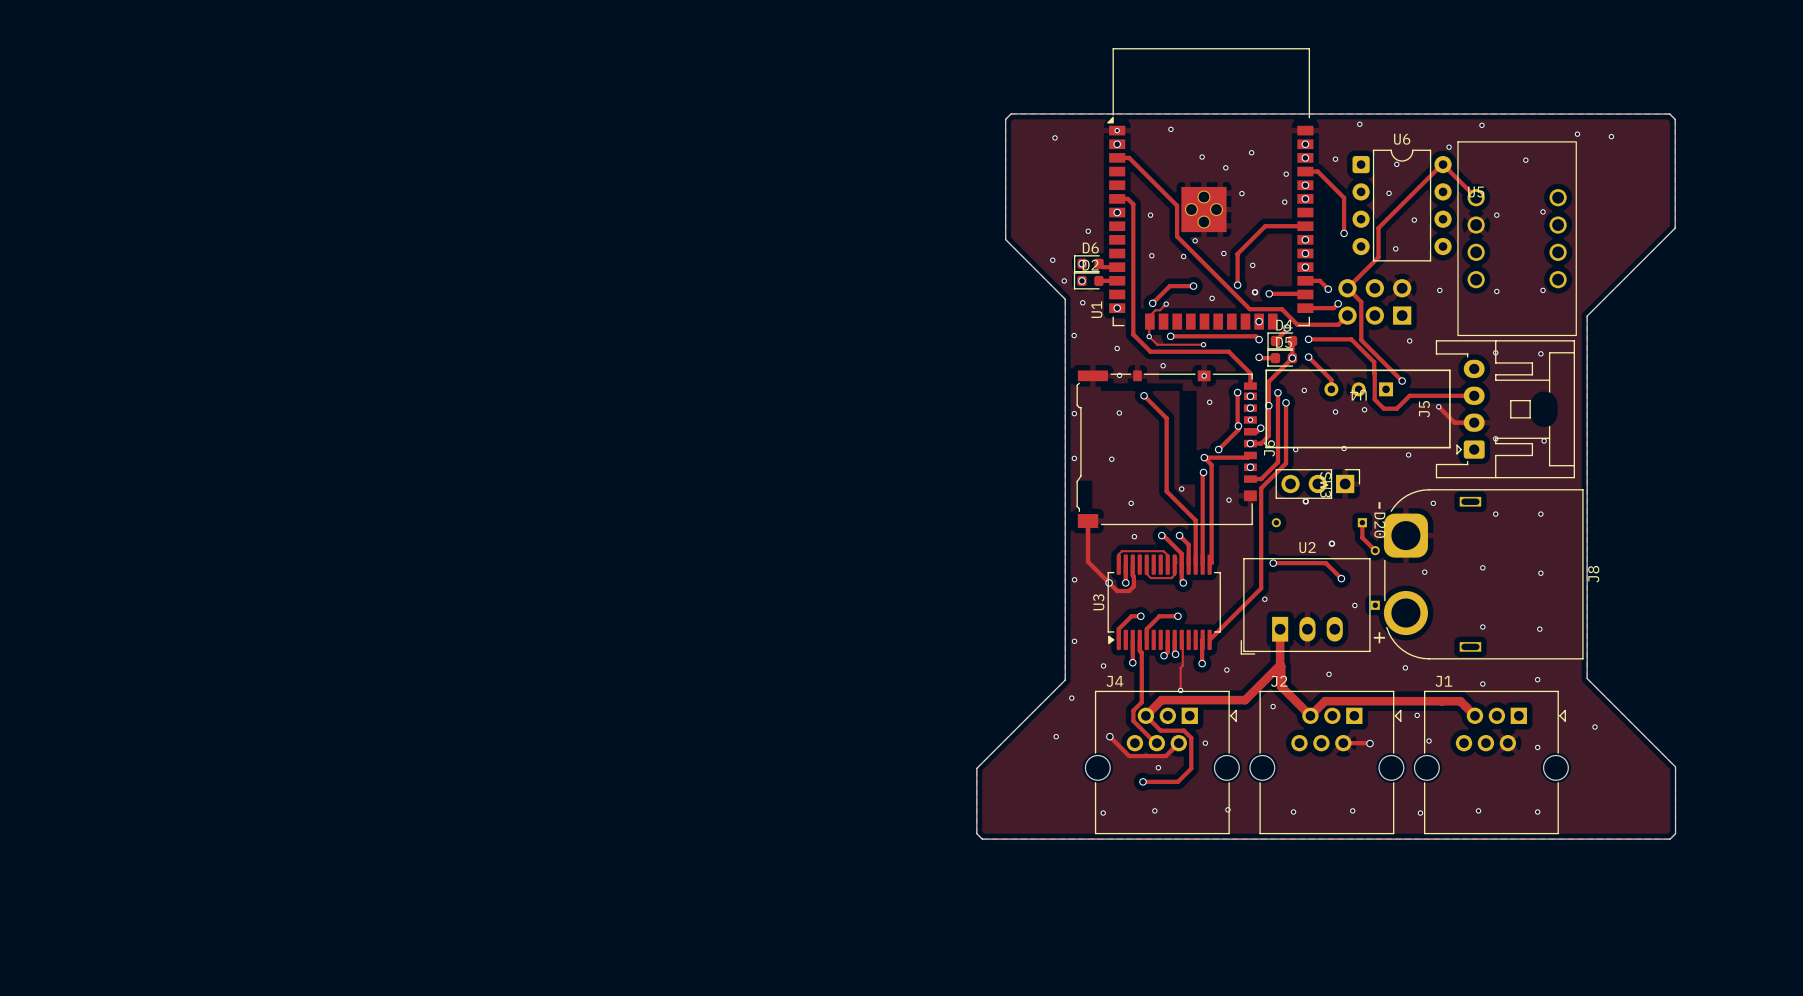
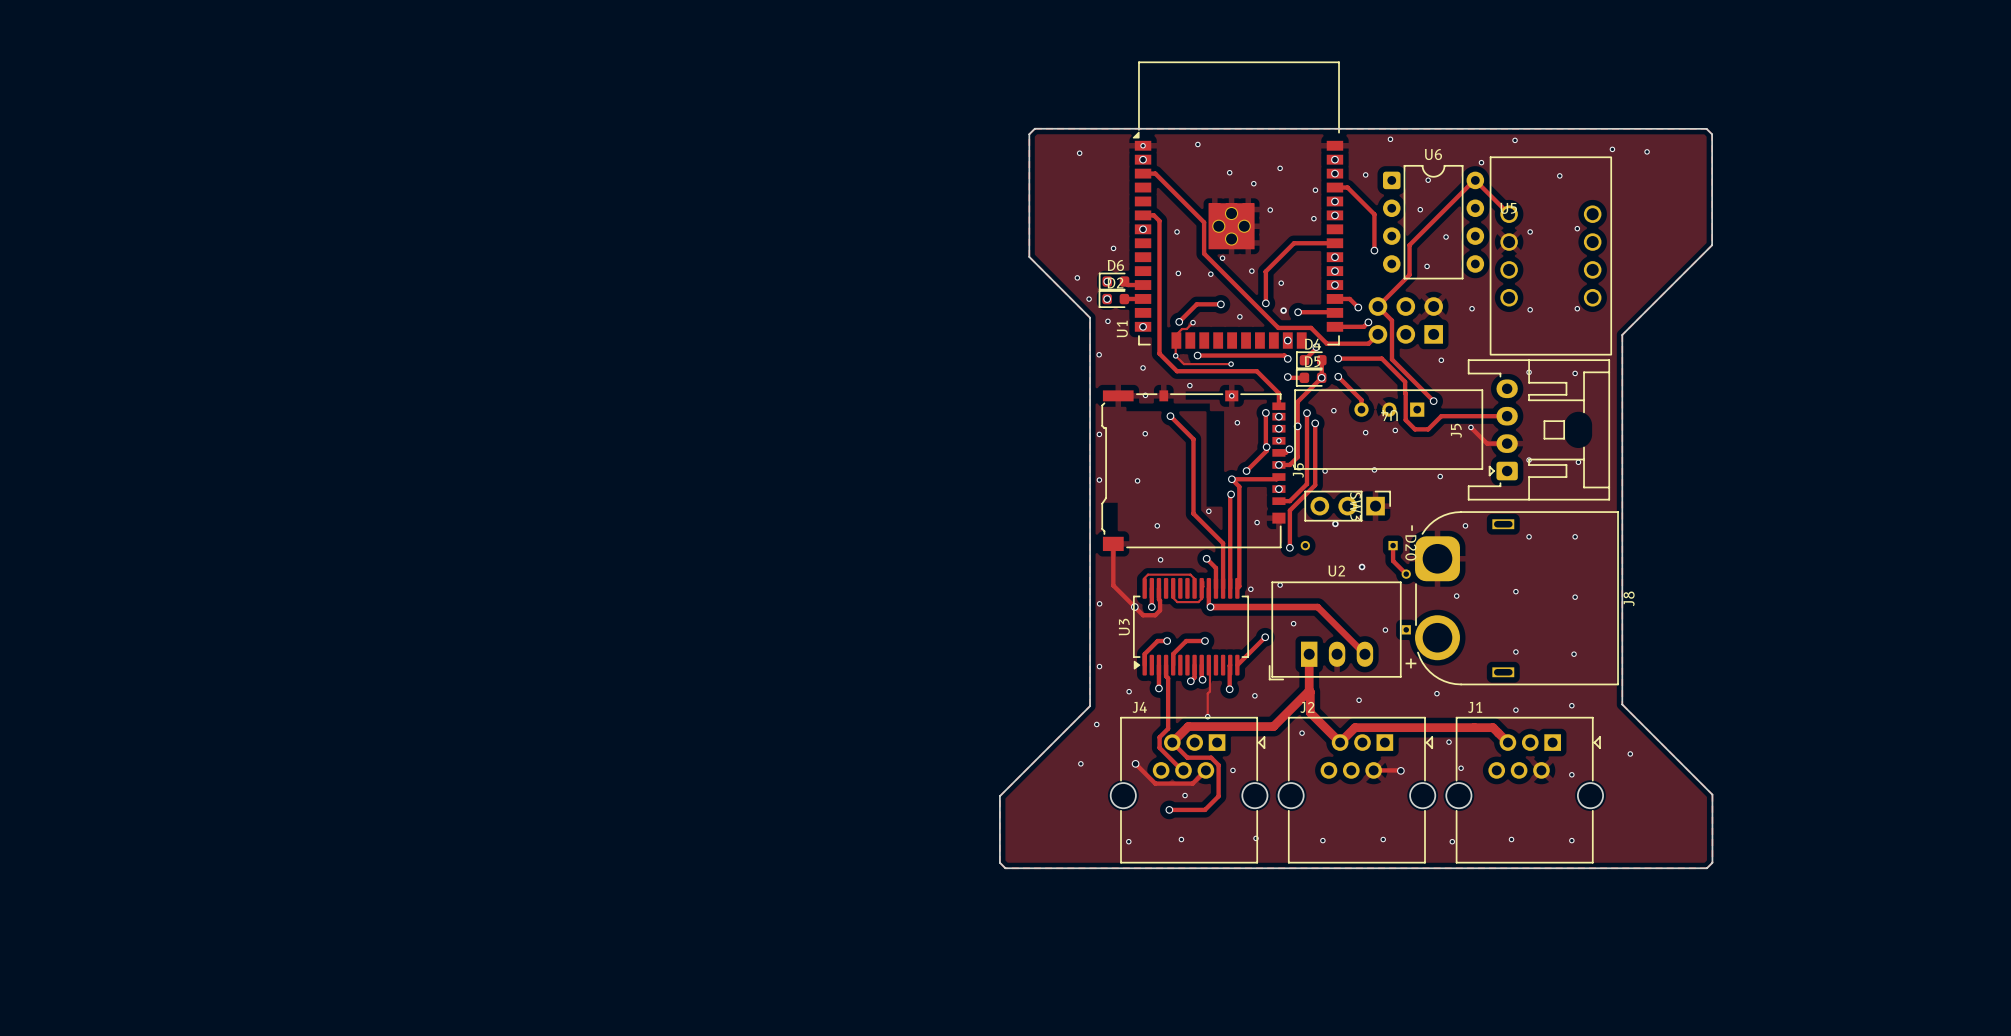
track: (1261, 524) (1261, 588) (1237, 612) -> none
via: none -> (1289, 547)
track: (1161, 535) (1181, 553) (1181, 564) -> none
via: (1161, 535) -> none
via: none -> (1280, 585)
track: (1273, 563) (1325, 563) (1341, 578) -> none
via: (1273, 563) -> none
via: none -> (1250, 589)
via: (1341, 578) -> none
track: none -> (1210, 607) (1317, 607) (1364, 654)
via: none -> (1265, 637)

